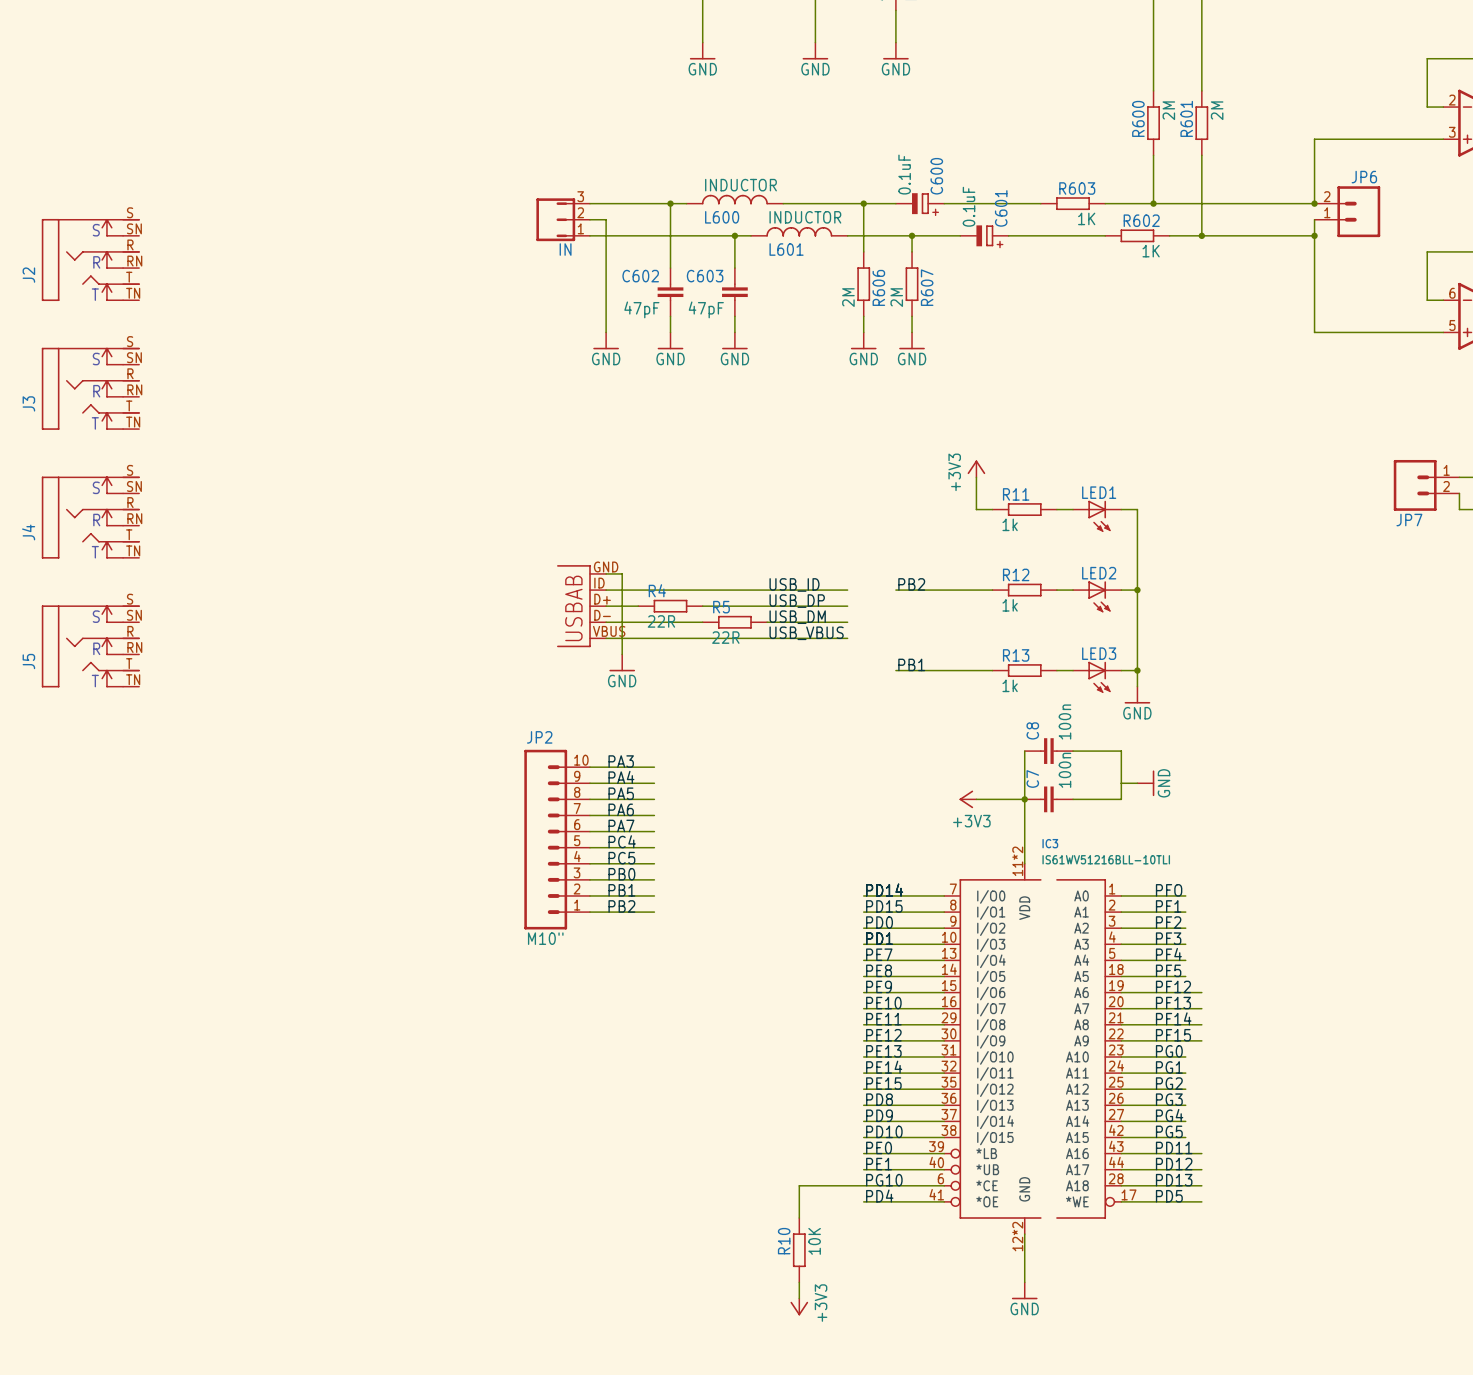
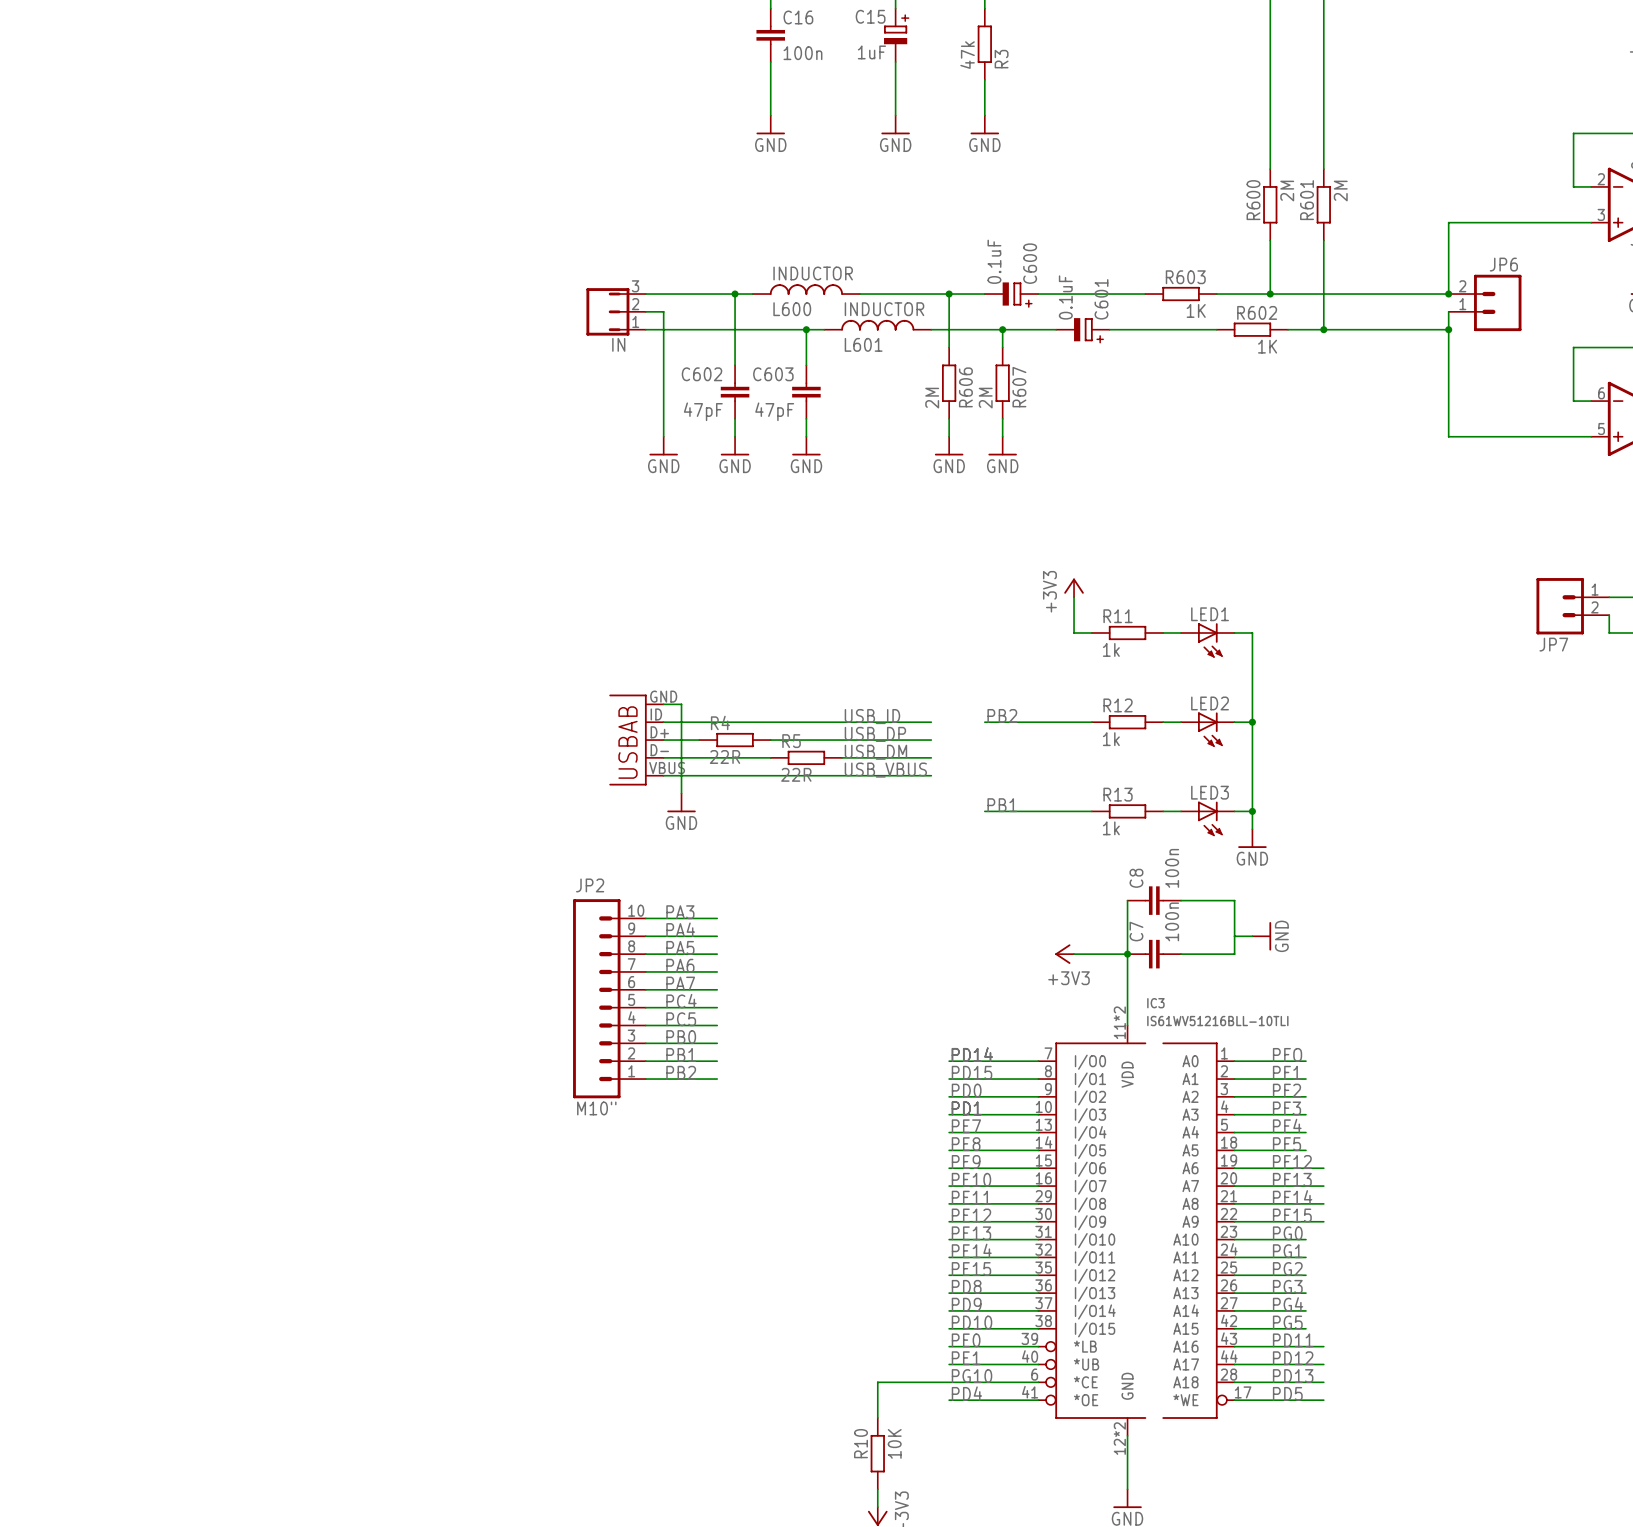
J2: (90, 259) -> none
J3: (90, 388) -> none
J4: (90, 517) -> none
J5: (90, 646) -> none

